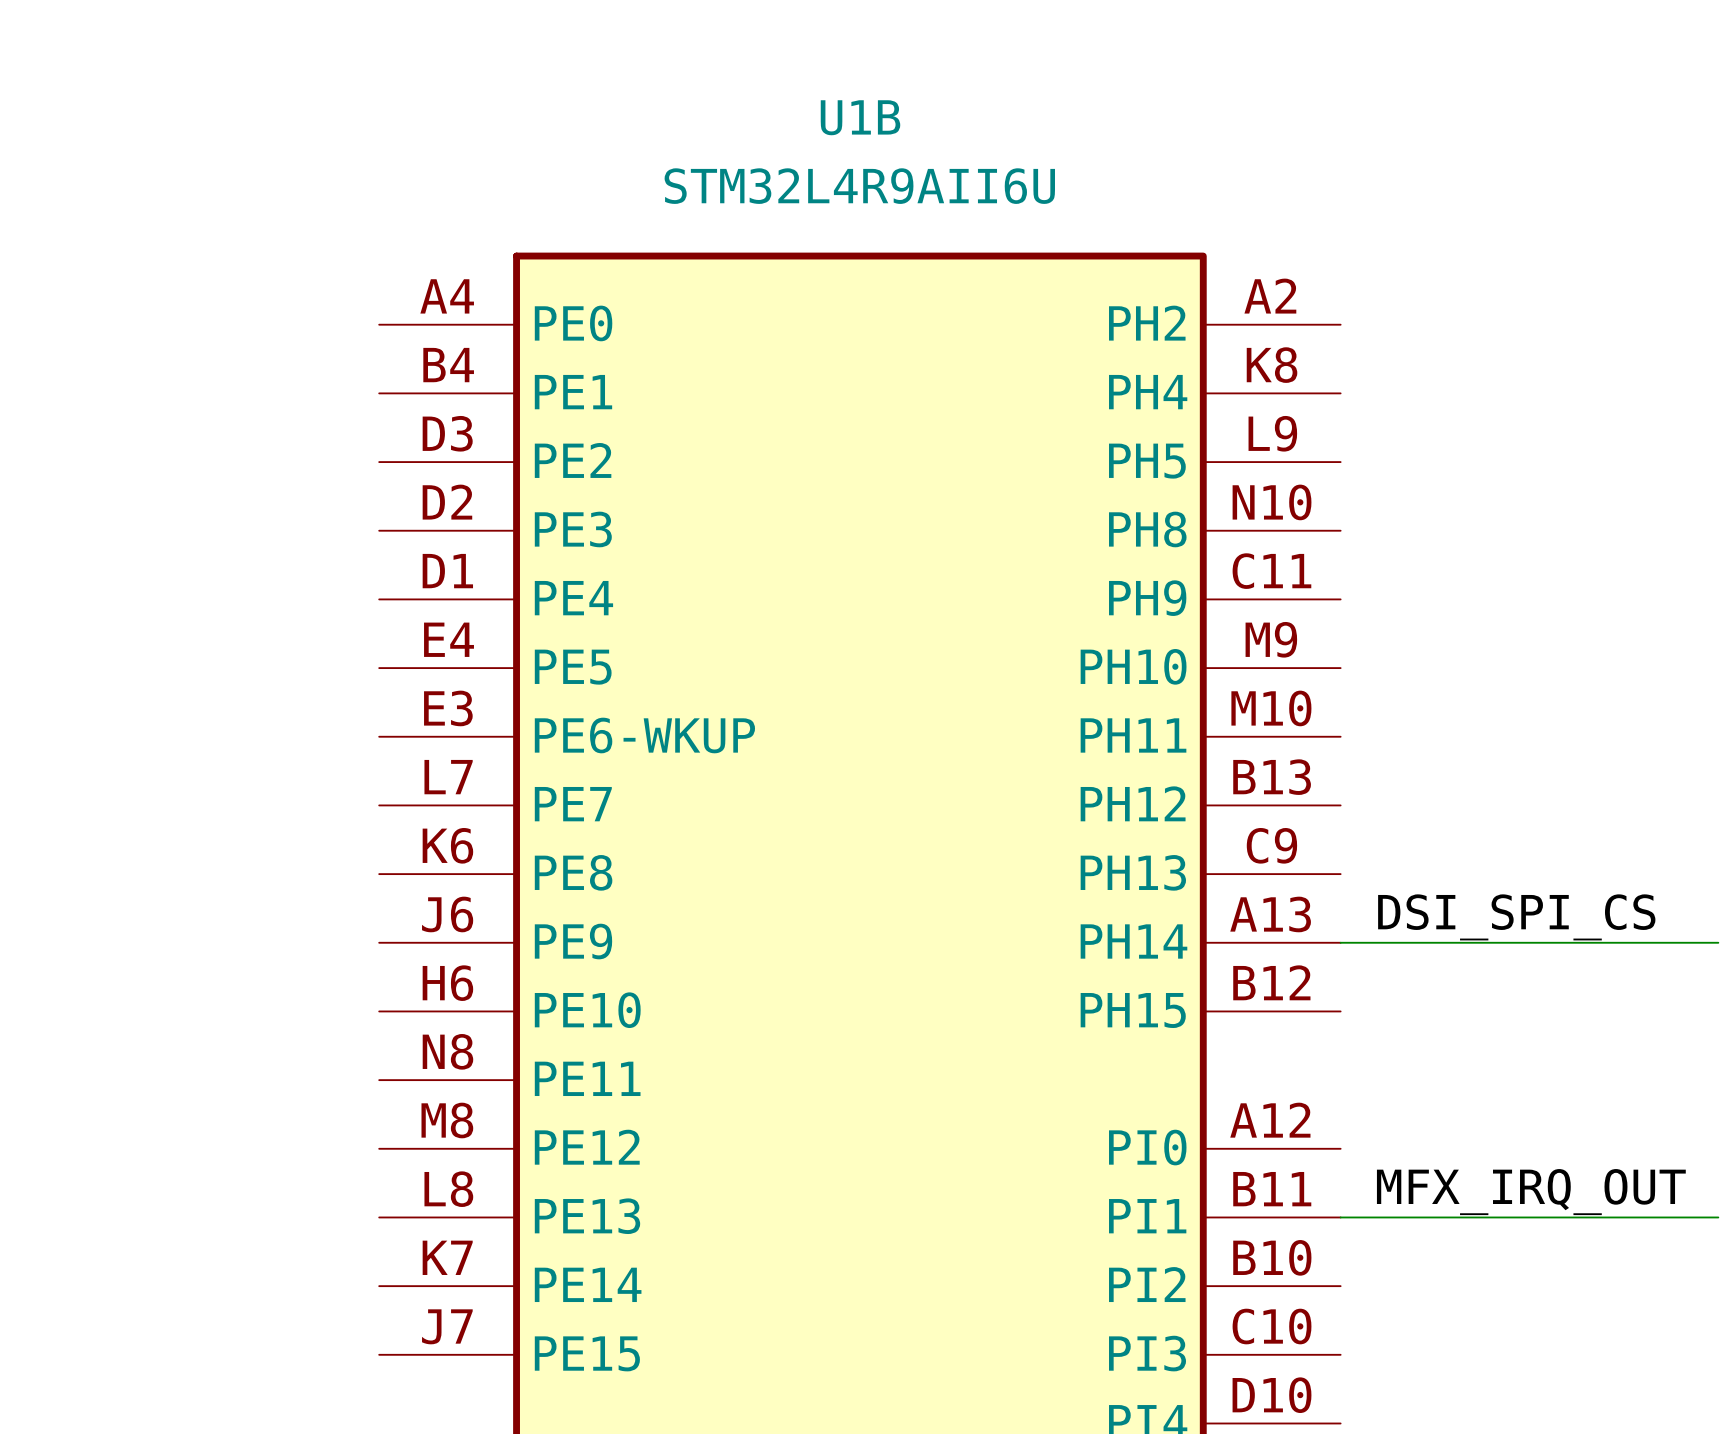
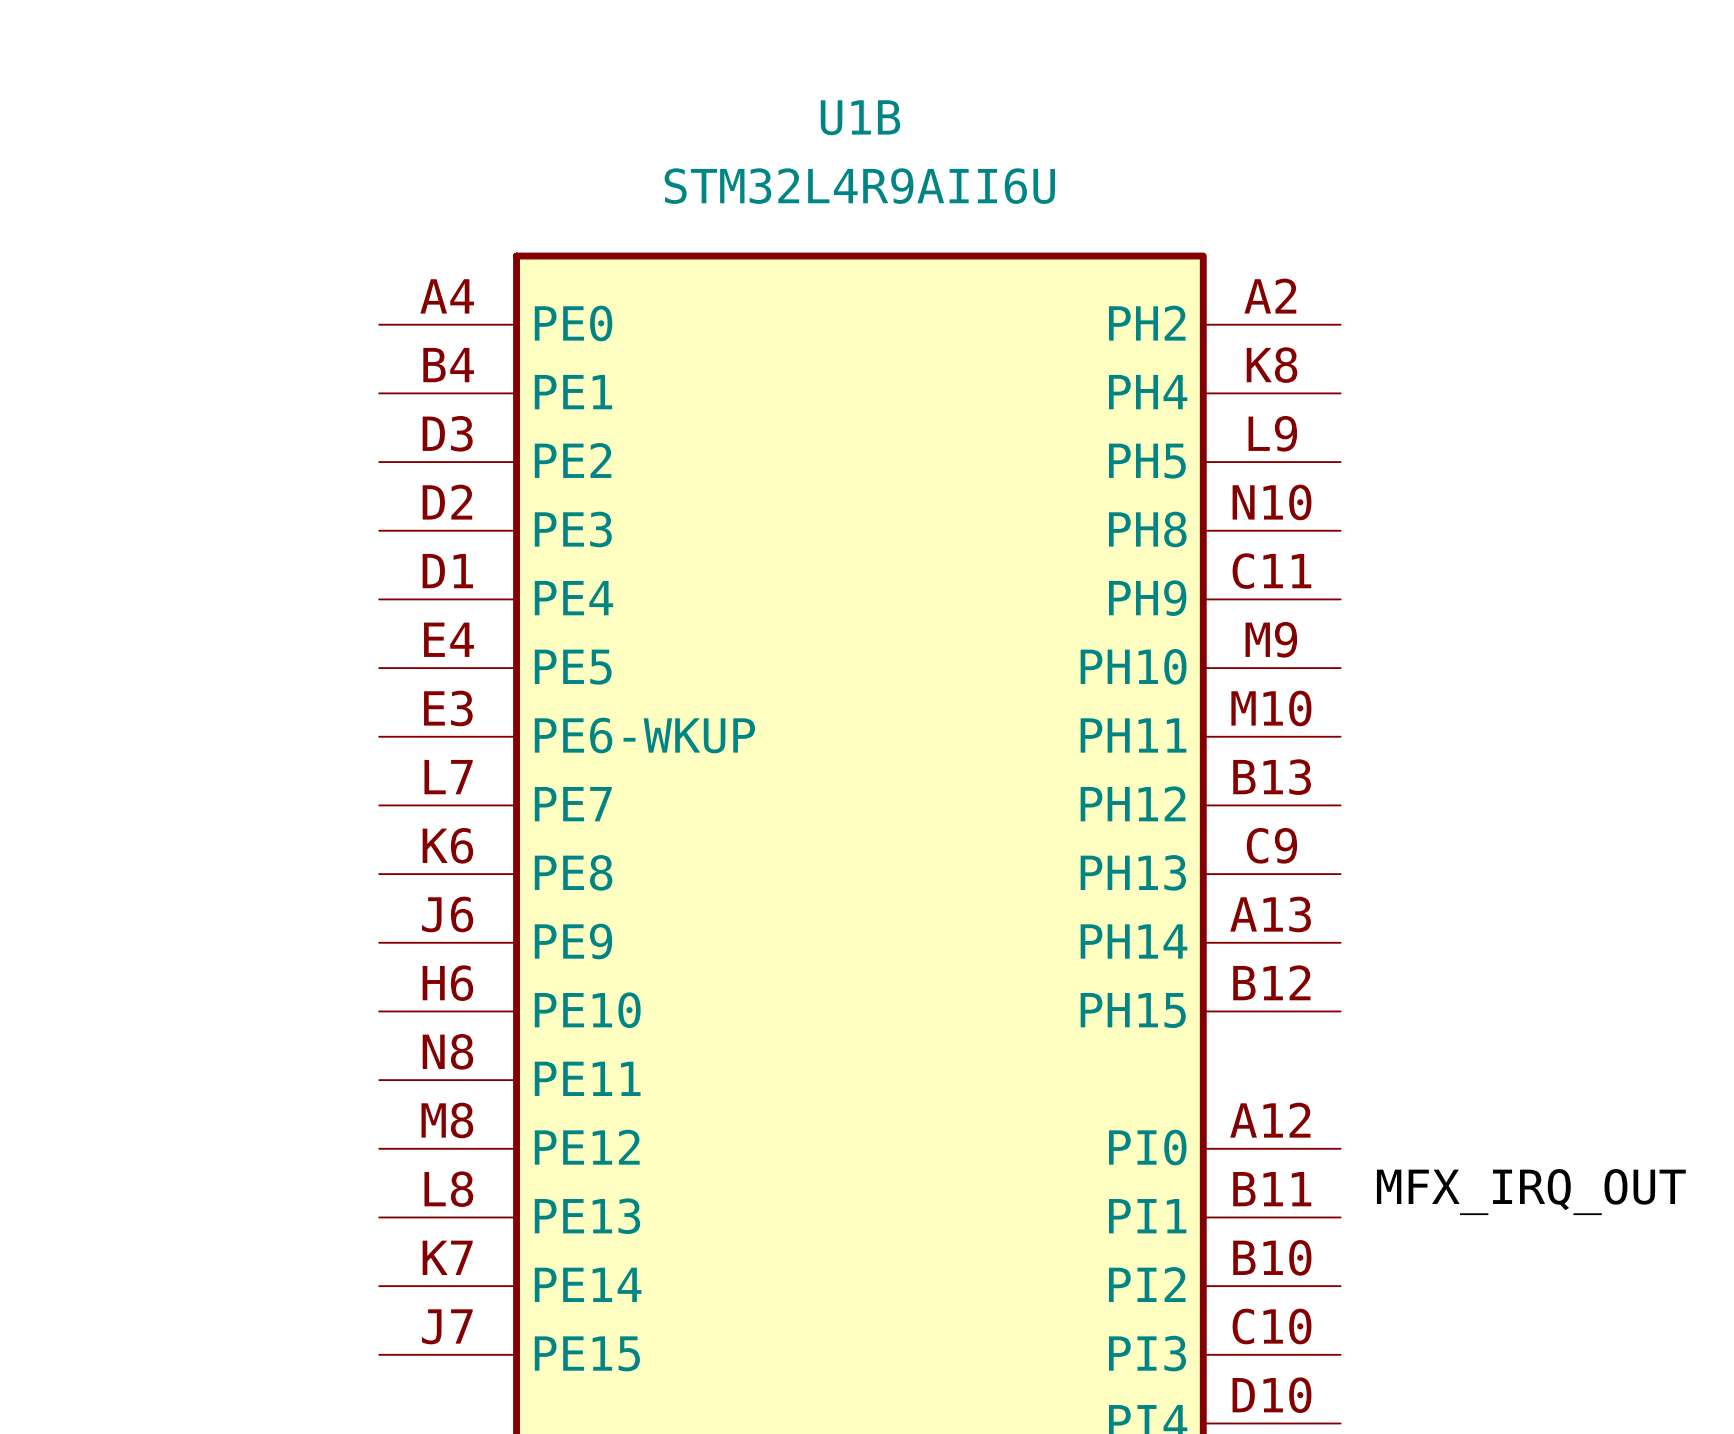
label: DSI_SPI_CS (1516, 917) -> none
wire: (1340, 942) (1718, 942) -> none
wire: (1340, 1217) (1718, 1217) -> none

